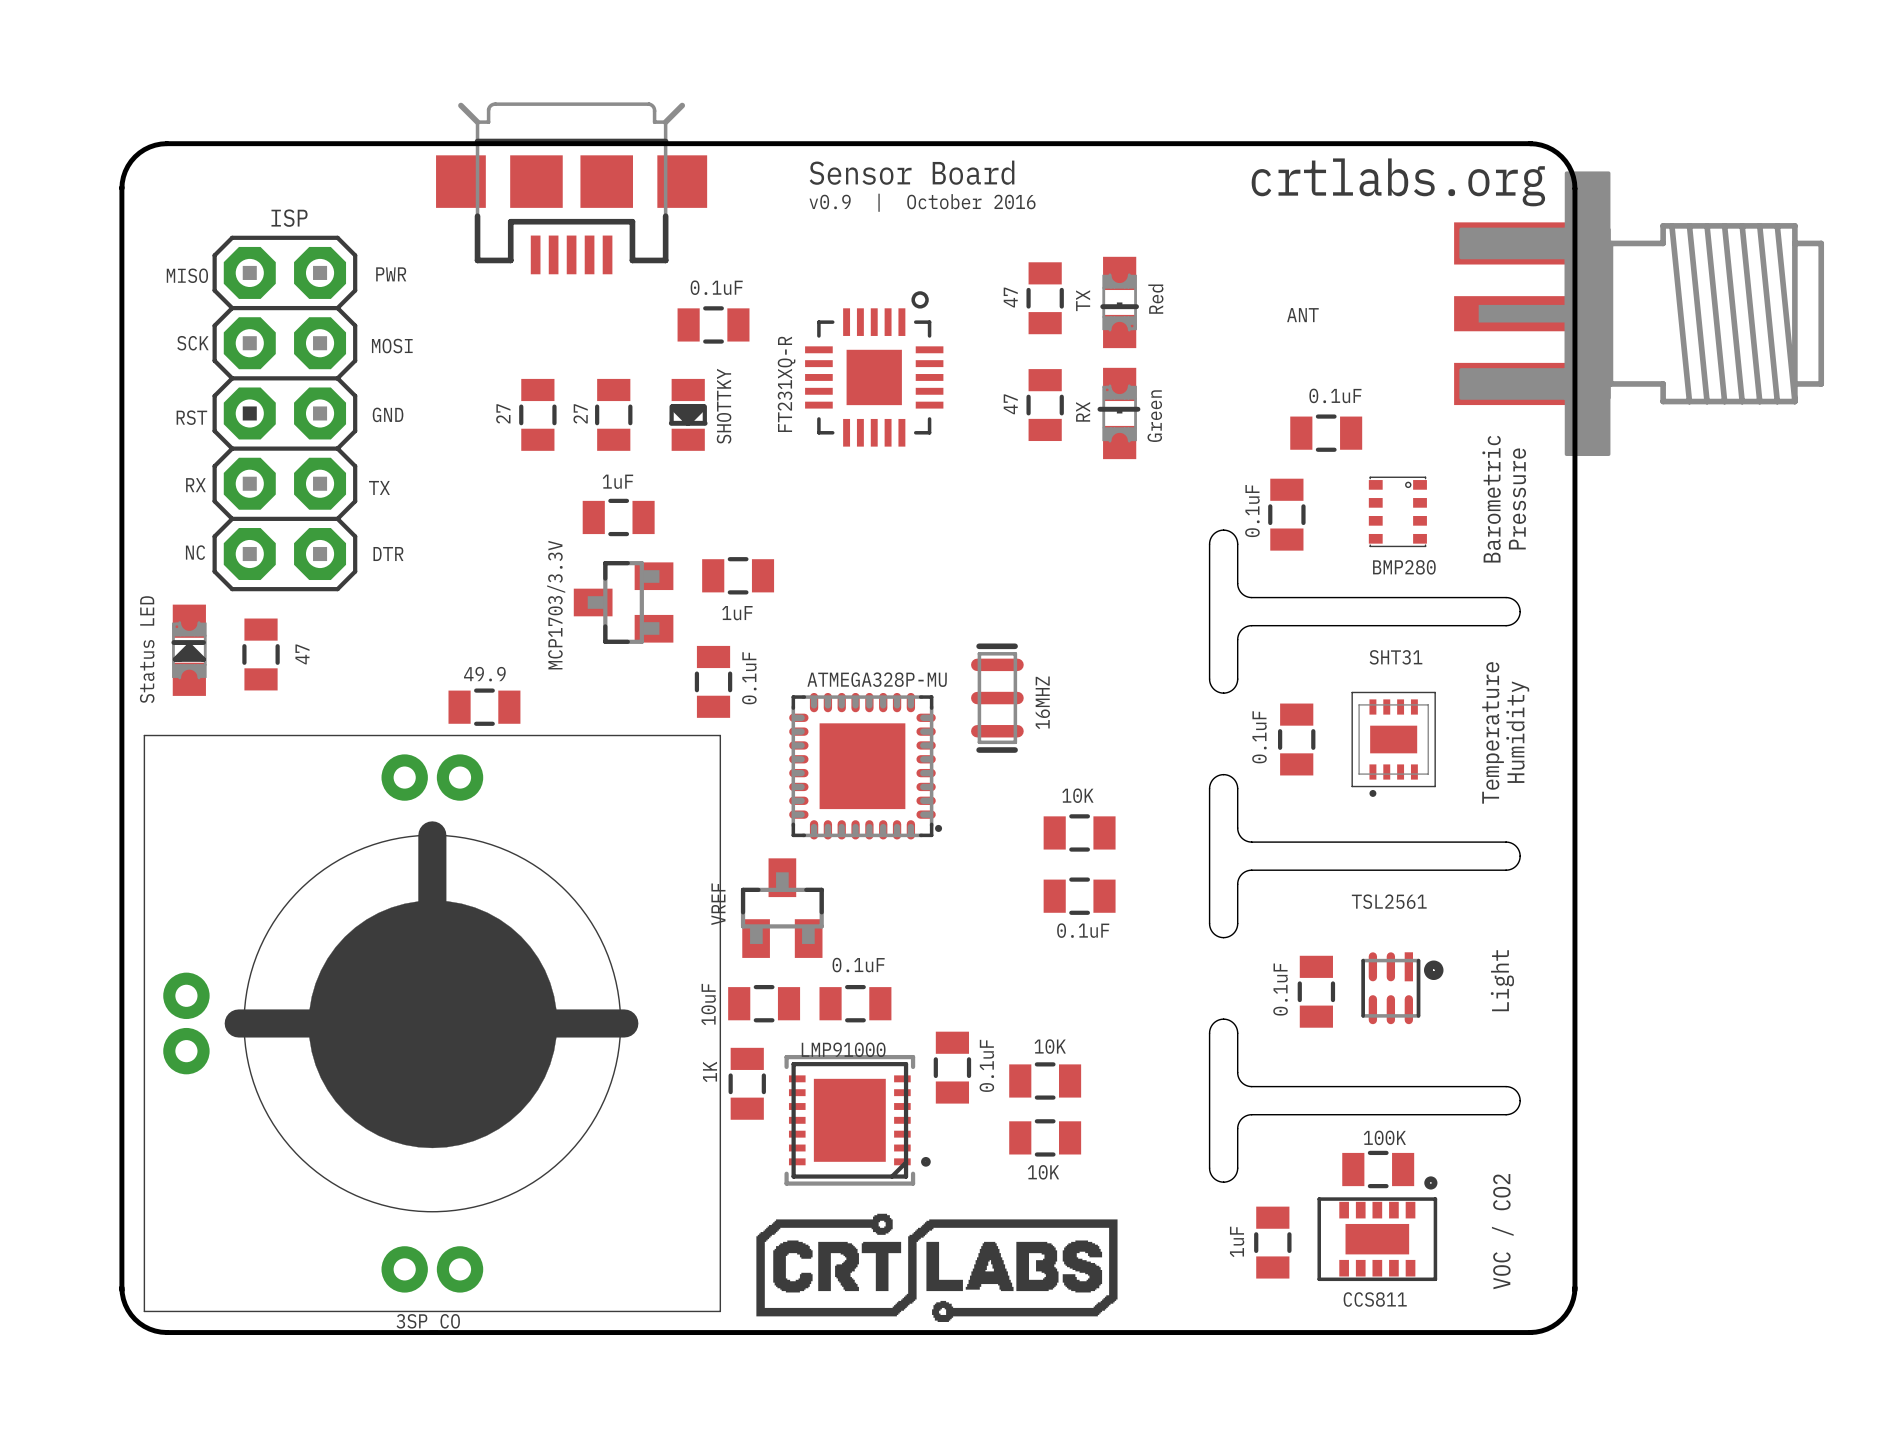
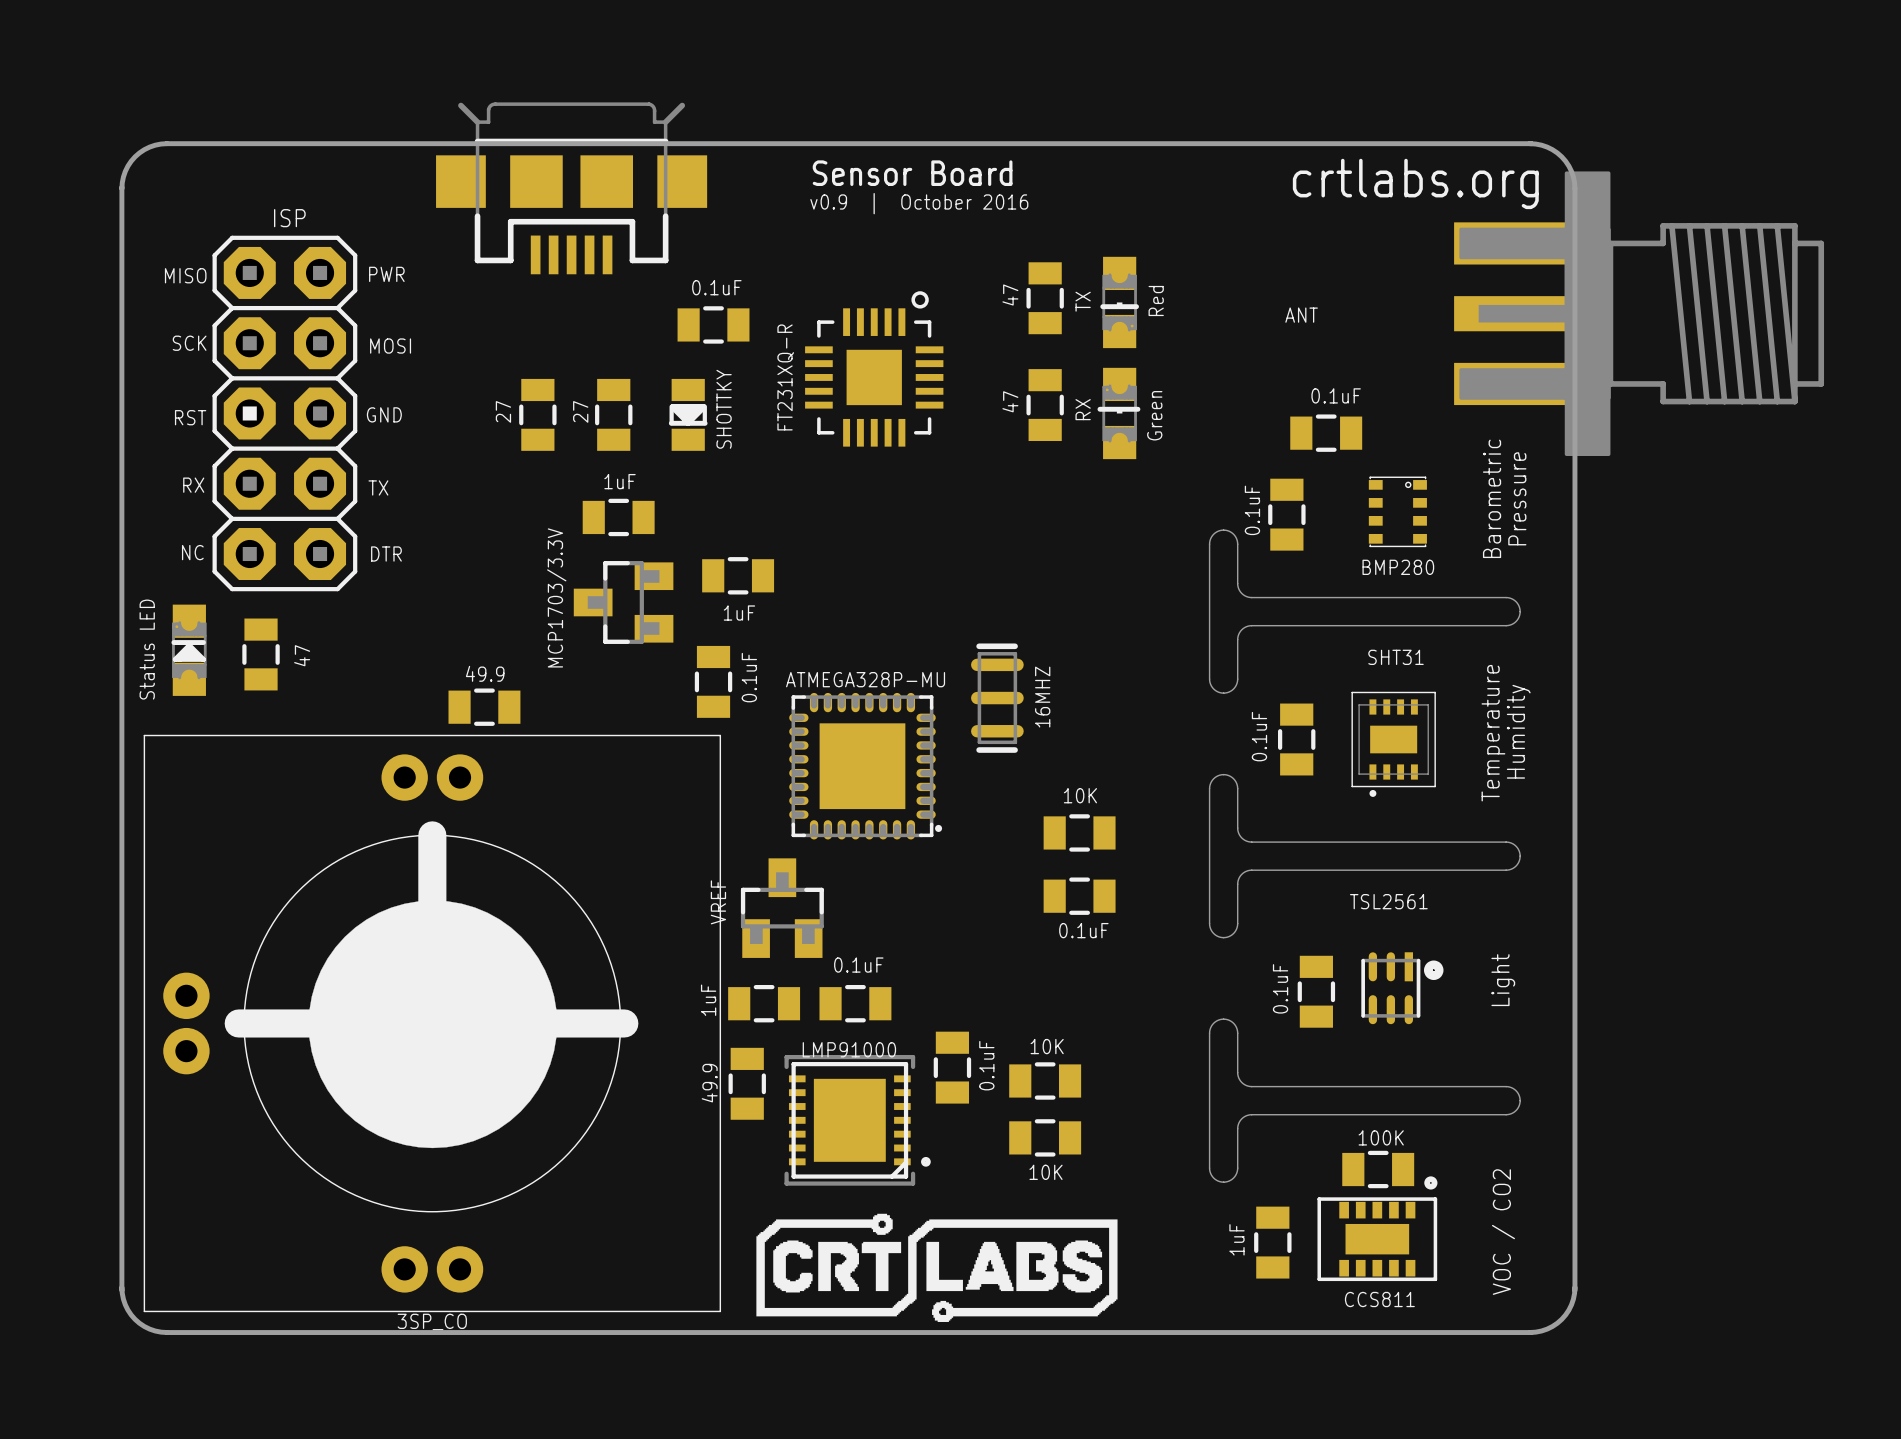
part value: 10uF (708, 1004) -> 1uF (708, 1000)
part value: 1K (710, 1071) -> 49.9 (709, 1083)

